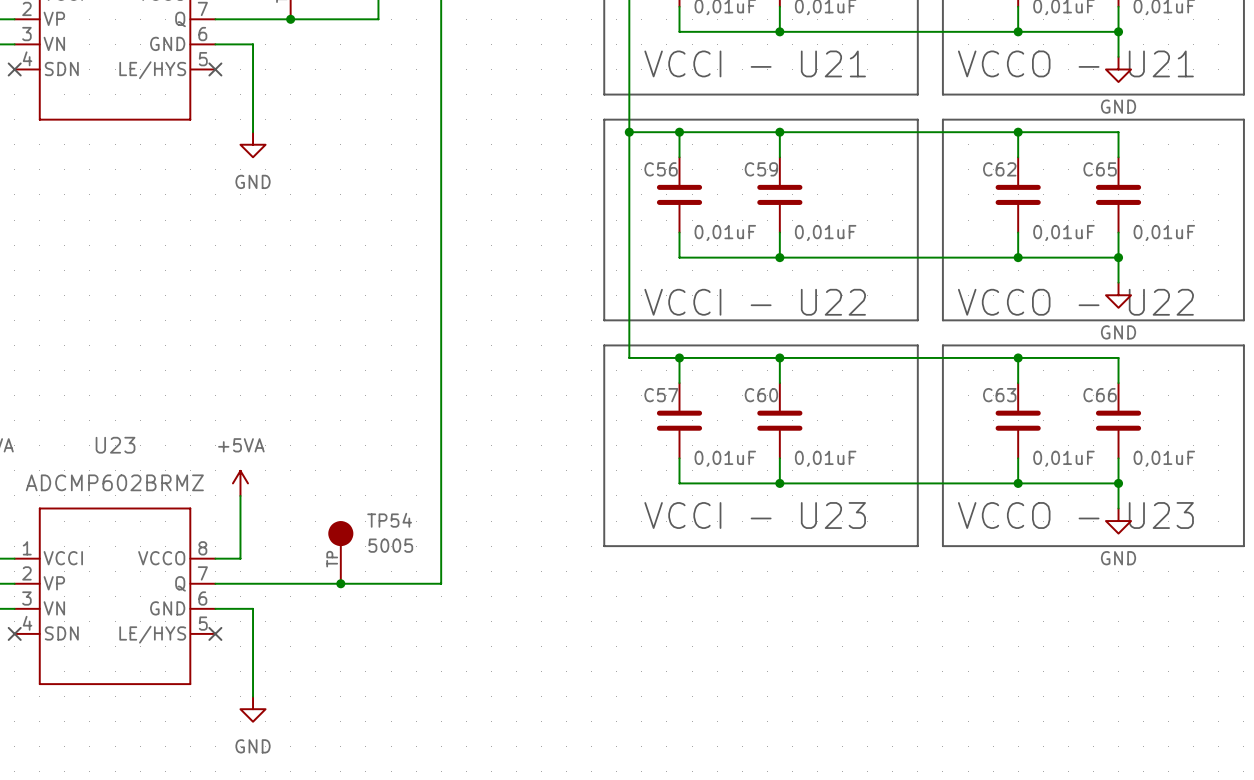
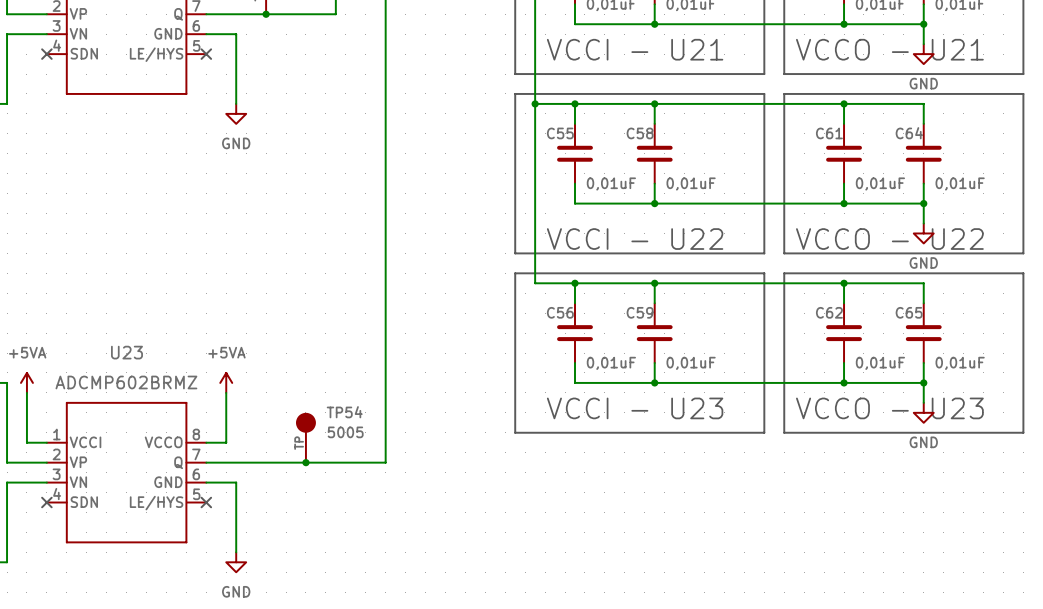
C56 name: C56 (661, 169) -> C55 (560, 133)
C59 name: C59 (761, 169) -> C58 (640, 133)
C62 name: C62 (999, 169) -> C61 (829, 133)
C65 name: C65 (1100, 169) -> C64 (909, 133)
C57 name: C57 (661, 395) -> C56 (560, 312)
C60 name: C60 (761, 395) -> C59 (640, 312)
C63 name: C63 (999, 395) -> C62 (829, 312)
C66 name: C66 (1100, 395) -> C65 (909, 312)

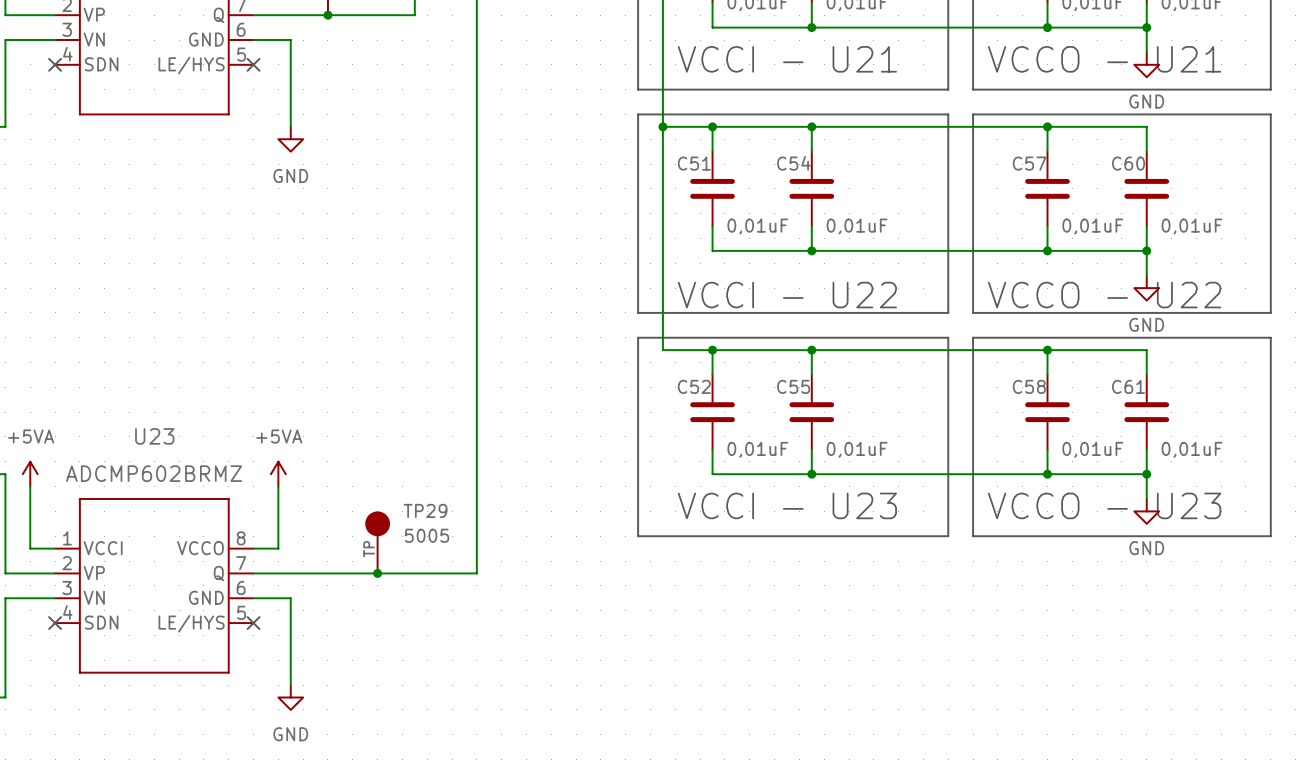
C55 name: C55 (560, 133) -> C51 (694, 163)
C58 name: C58 (640, 133) -> C54 (793, 163)
C61 name: C61 (829, 133) -> C57 (1029, 163)
C64 name: C64 (909, 133) -> C60 (1128, 163)
C56 name: C56 (560, 312) -> C52 (694, 386)
C59 name: C59 (640, 312) -> C55 (793, 386)
C62 name: C62 (829, 312) -> C58 (1029, 386)
C65 name: C65 (909, 312) -> C61 (1128, 386)
TP54 name: TP54 (344, 412) -> TP29 (425, 510)

